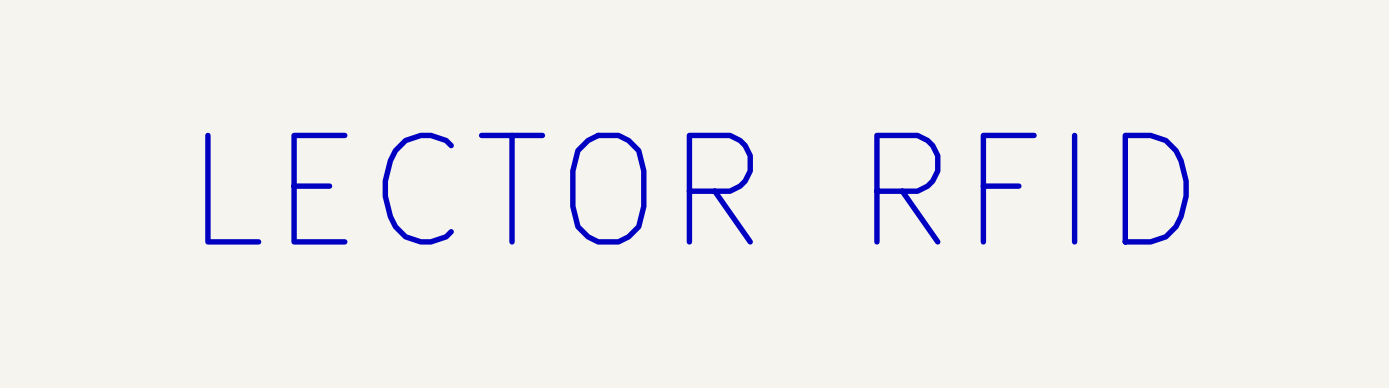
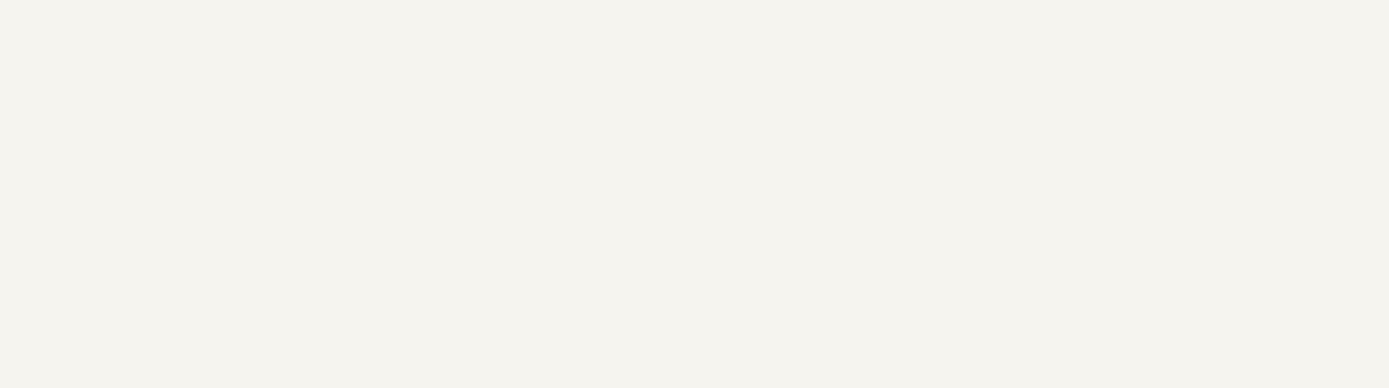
text: LECTOR RFID (697, 188) -> none

